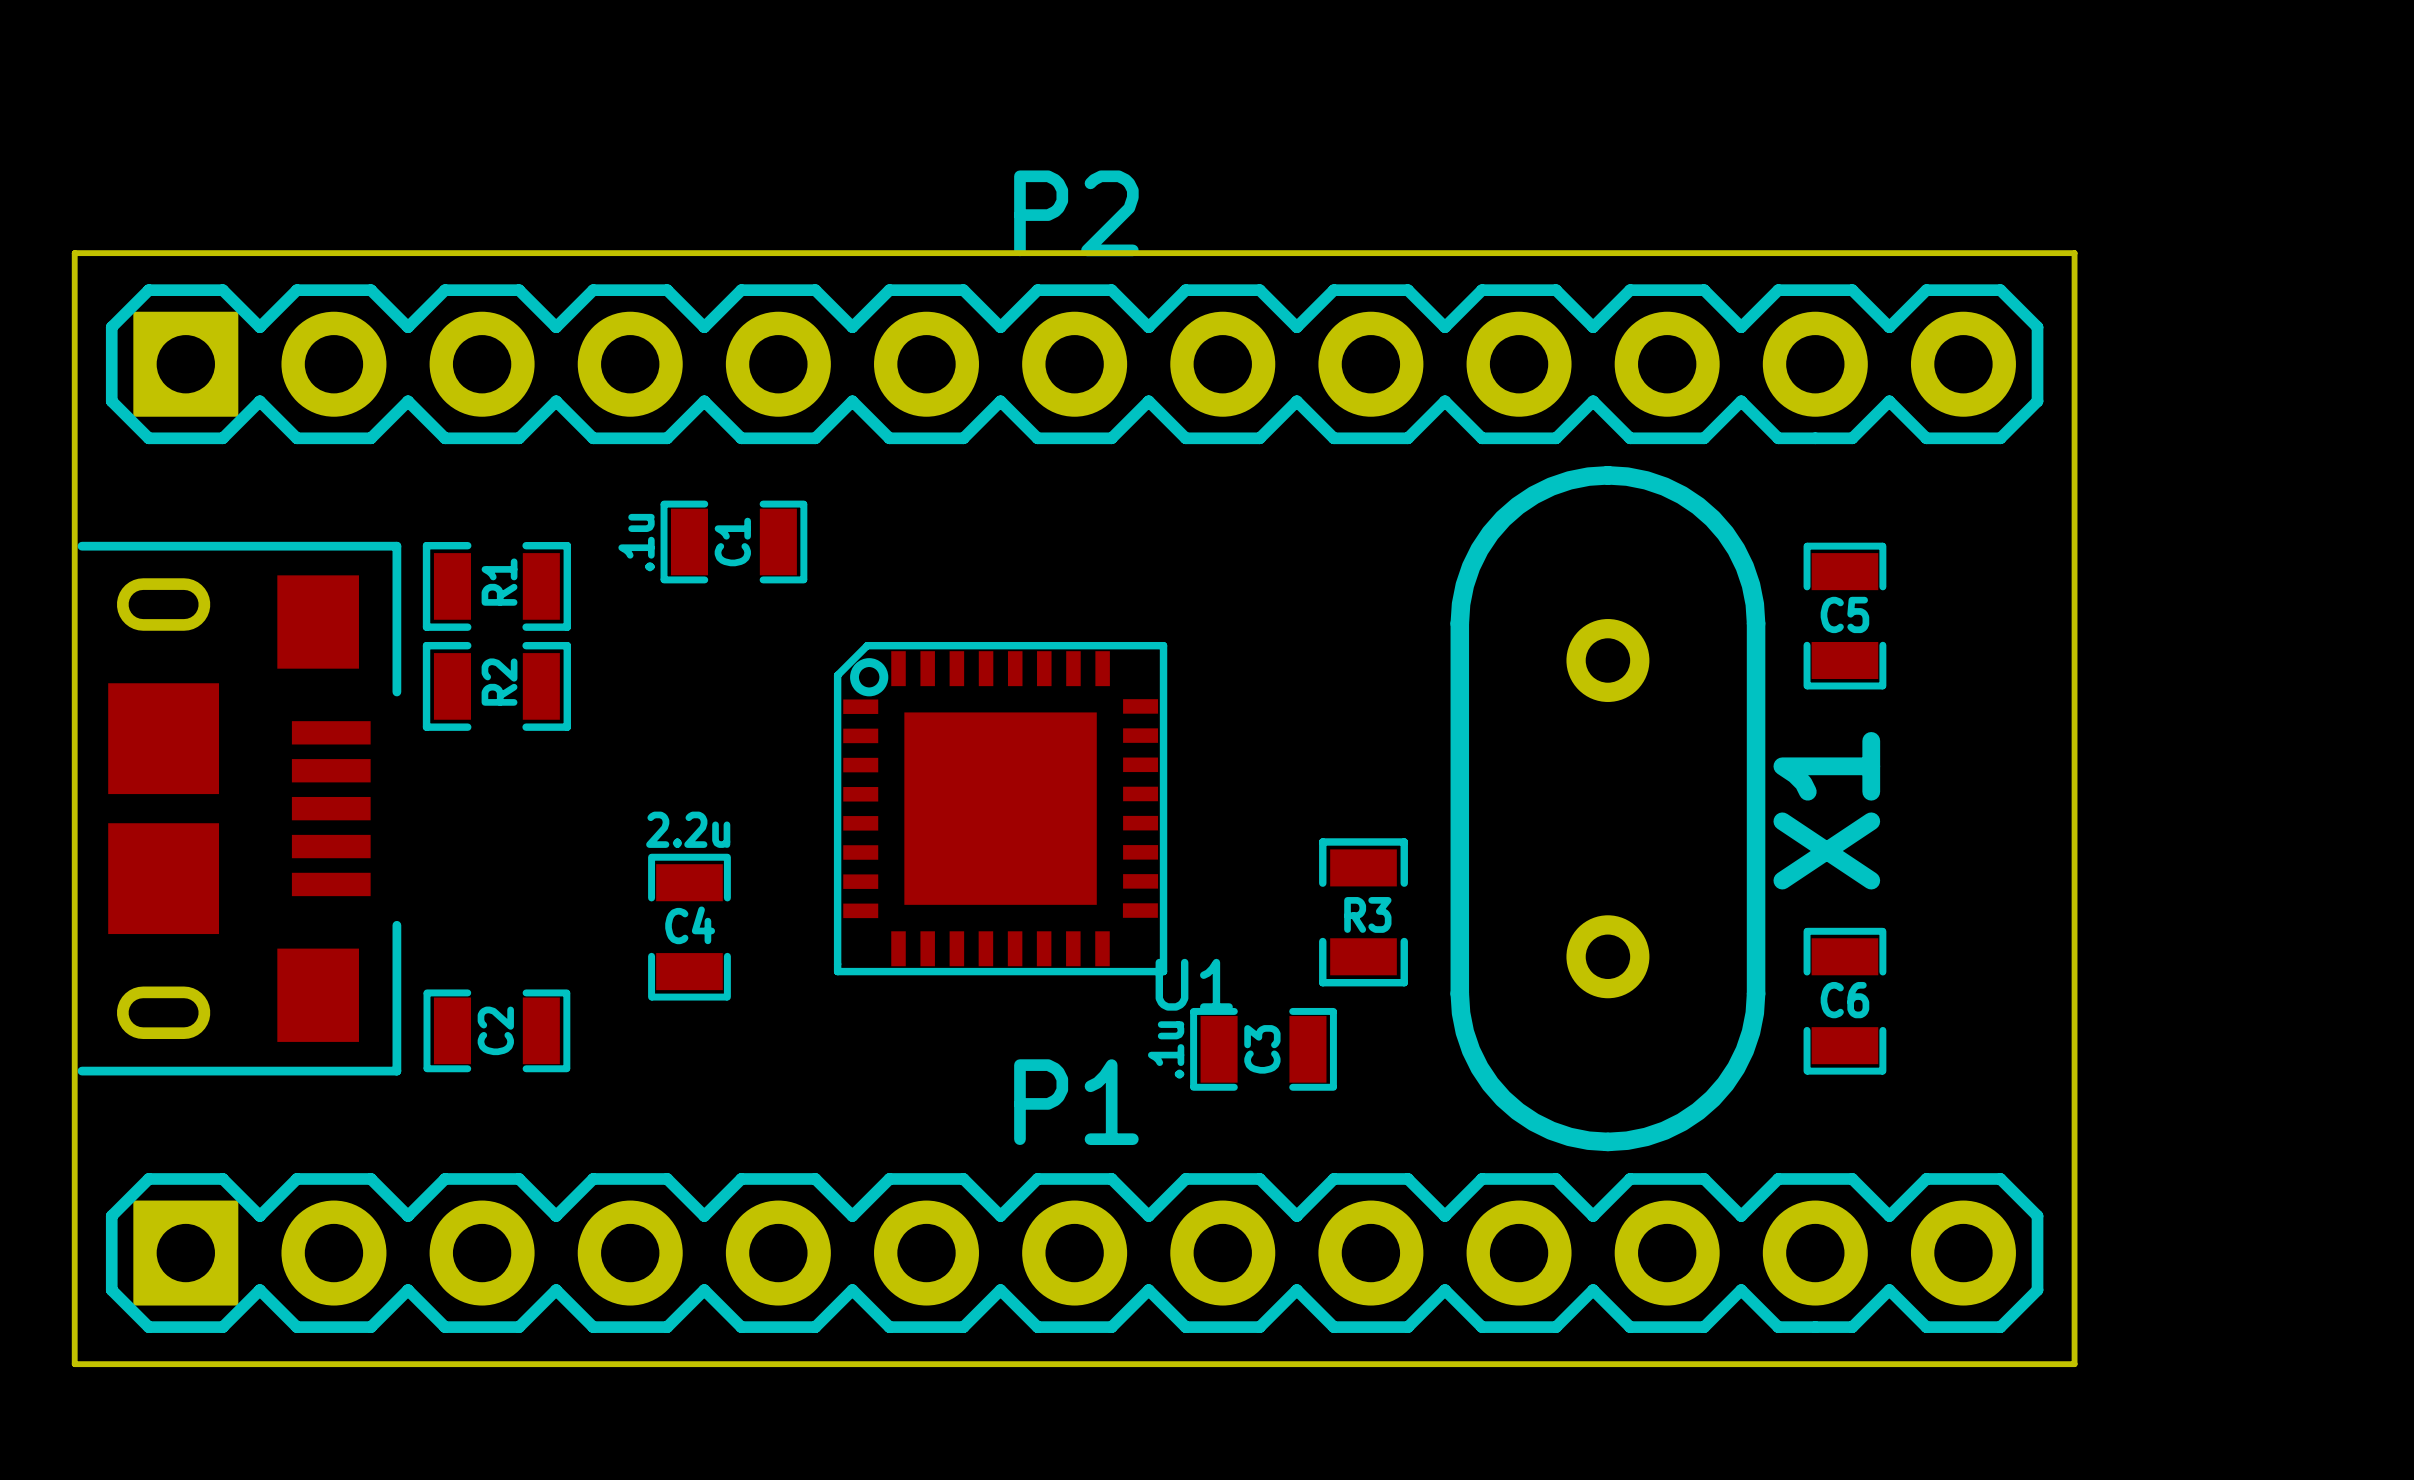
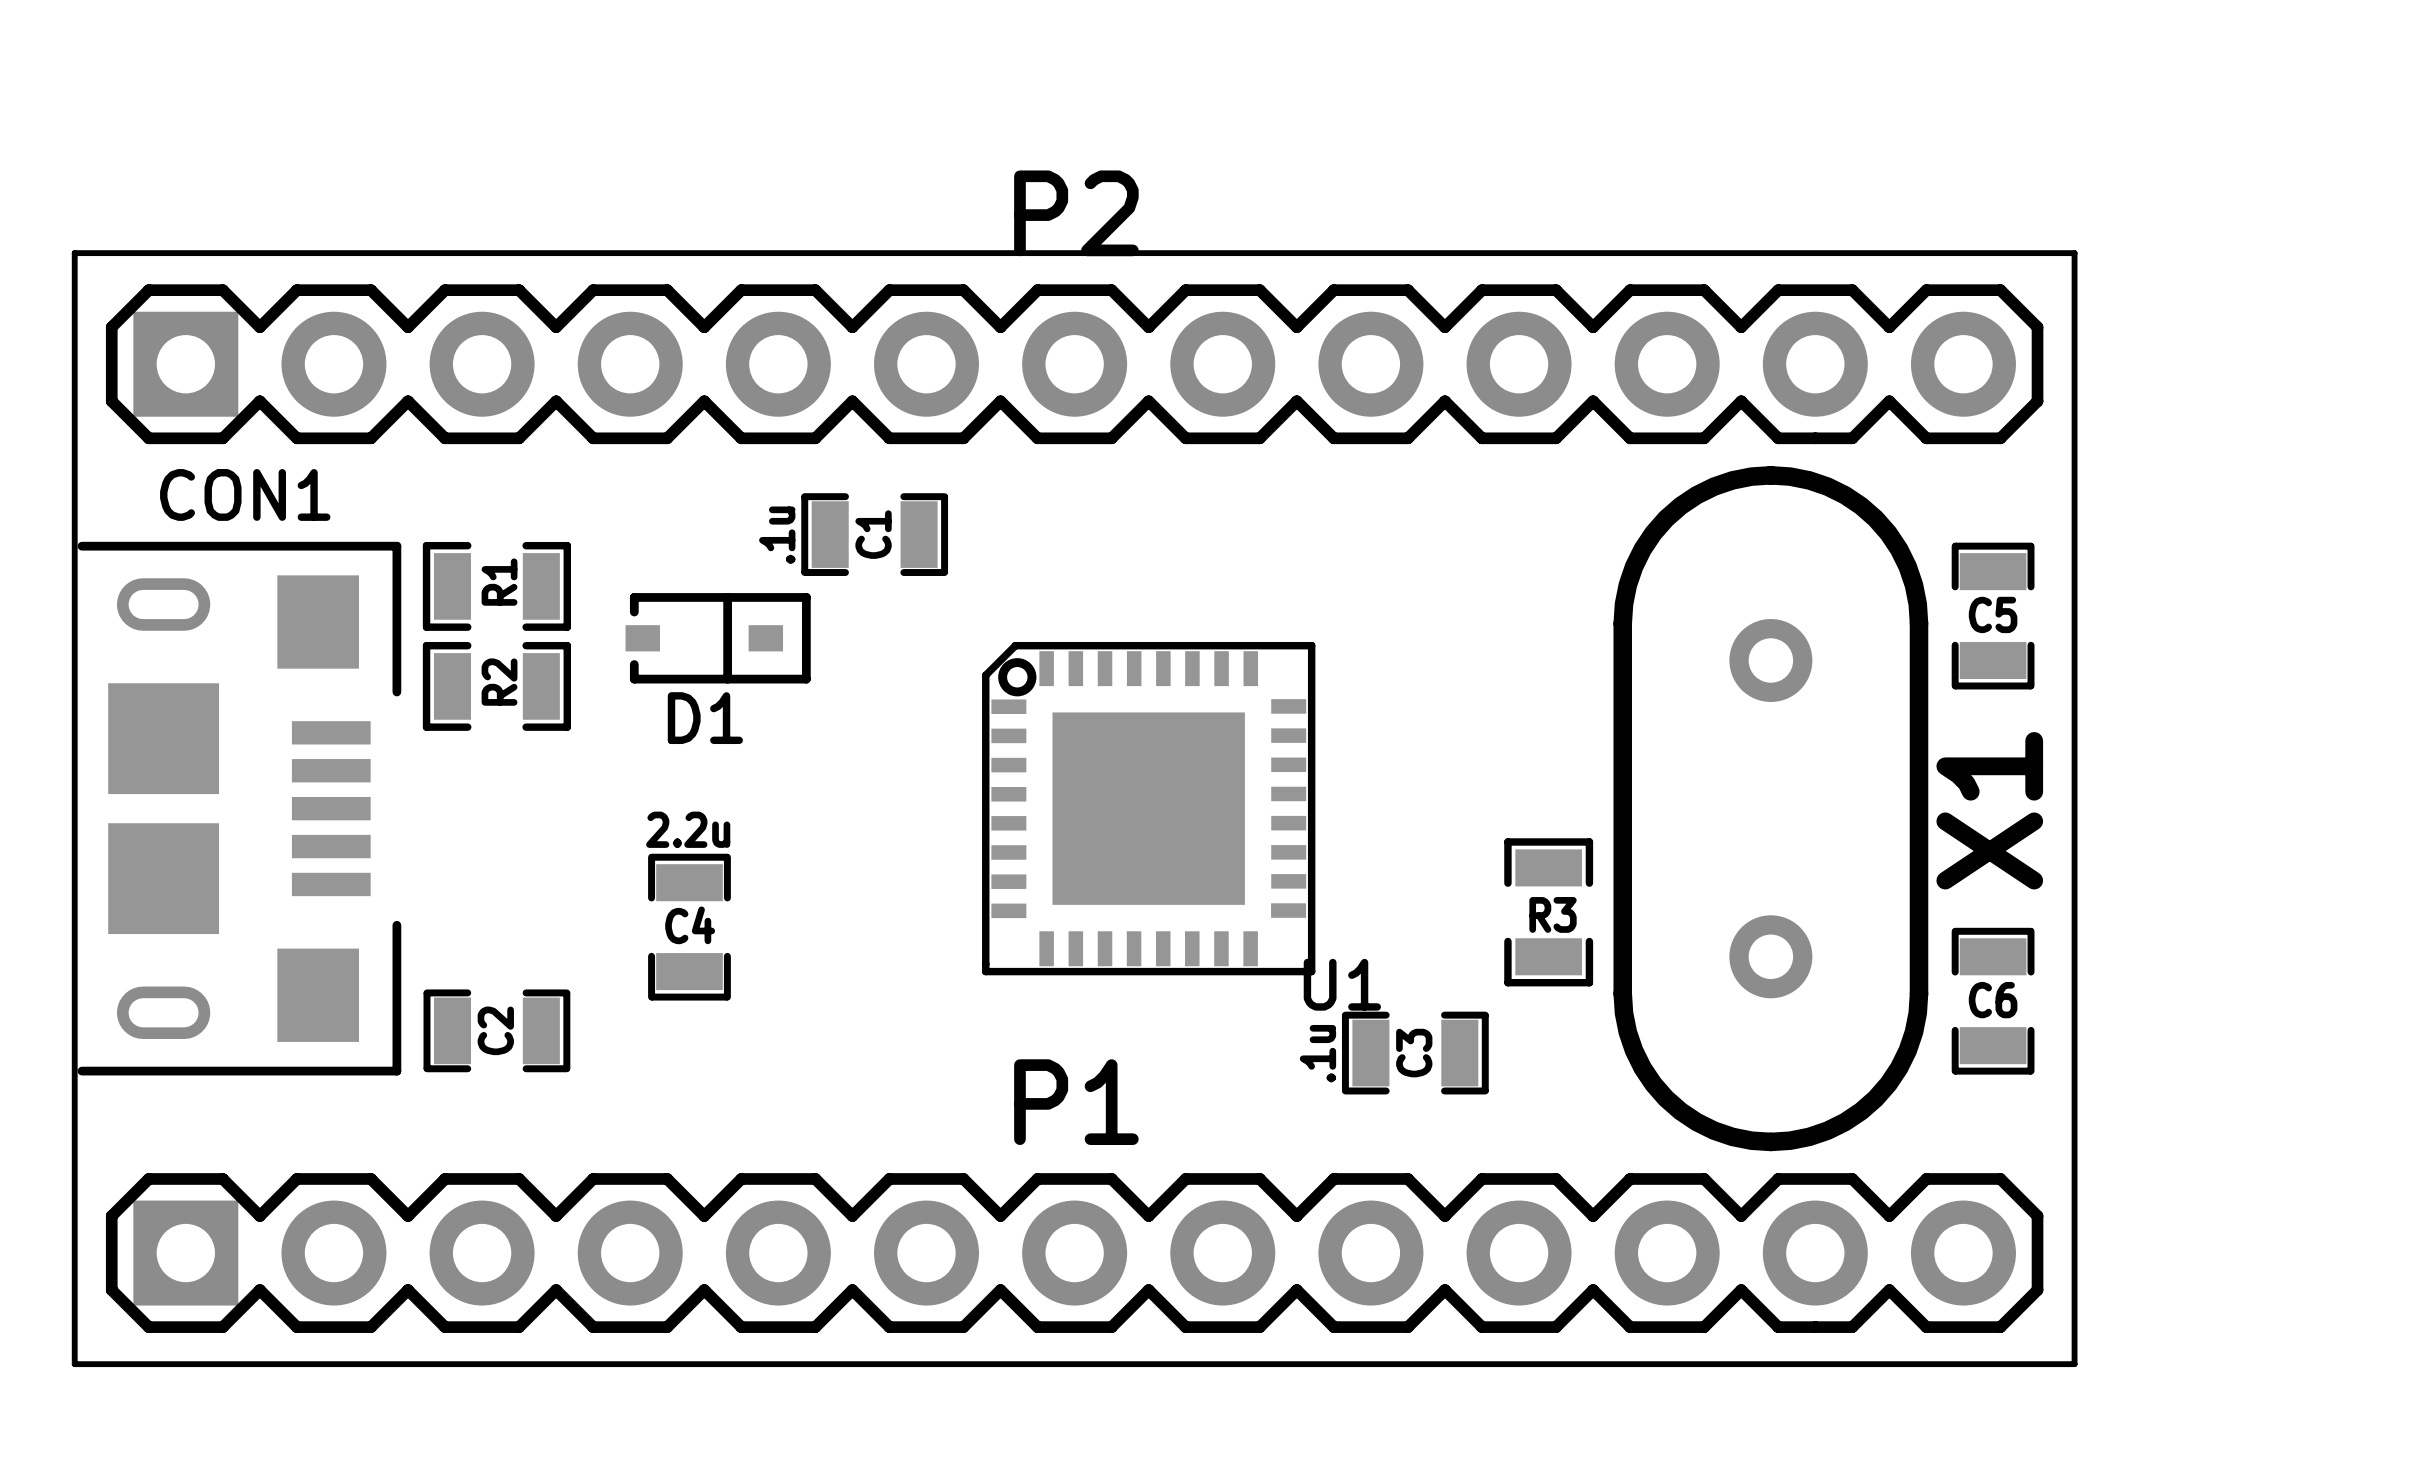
CON1 name: none -> CON1 (245, 494)
C1 position: (733, 541) -> (874, 534)
C5 position: (1844, 616) -> (1993, 616)
D1: none -> (718, 638)
U1 position: (1000, 808) -> (1148, 808)
X1 position: (1607, 808) -> (1770, 808)
R3 position: (1363, 912) -> (1548, 912)
C6 position: (1844, 1001) -> (1993, 1001)
C3 position: (1263, 1049) -> (1415, 1053)

